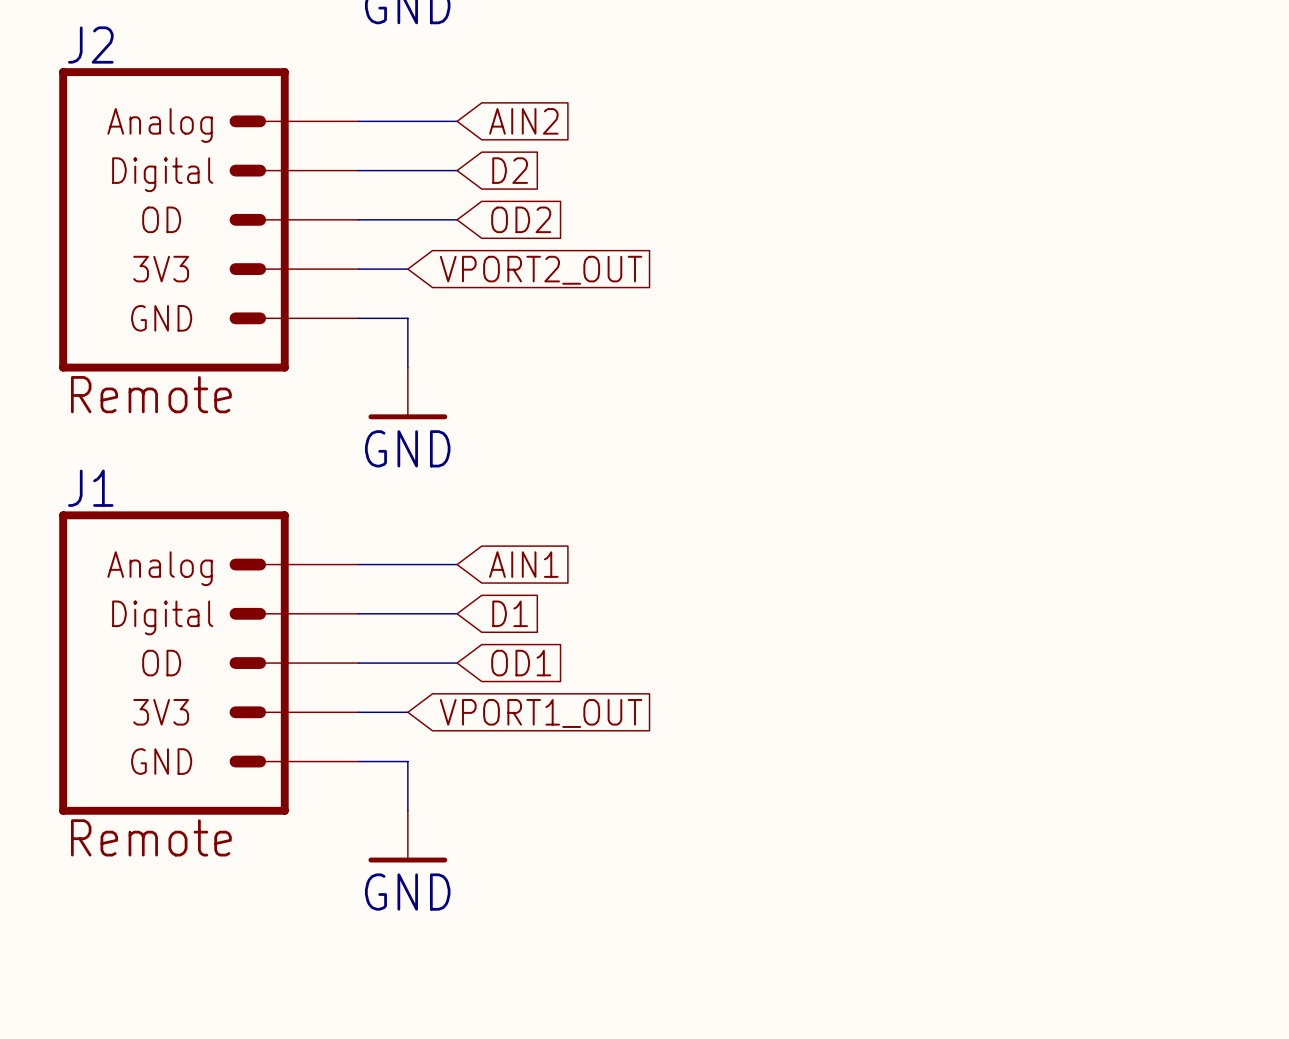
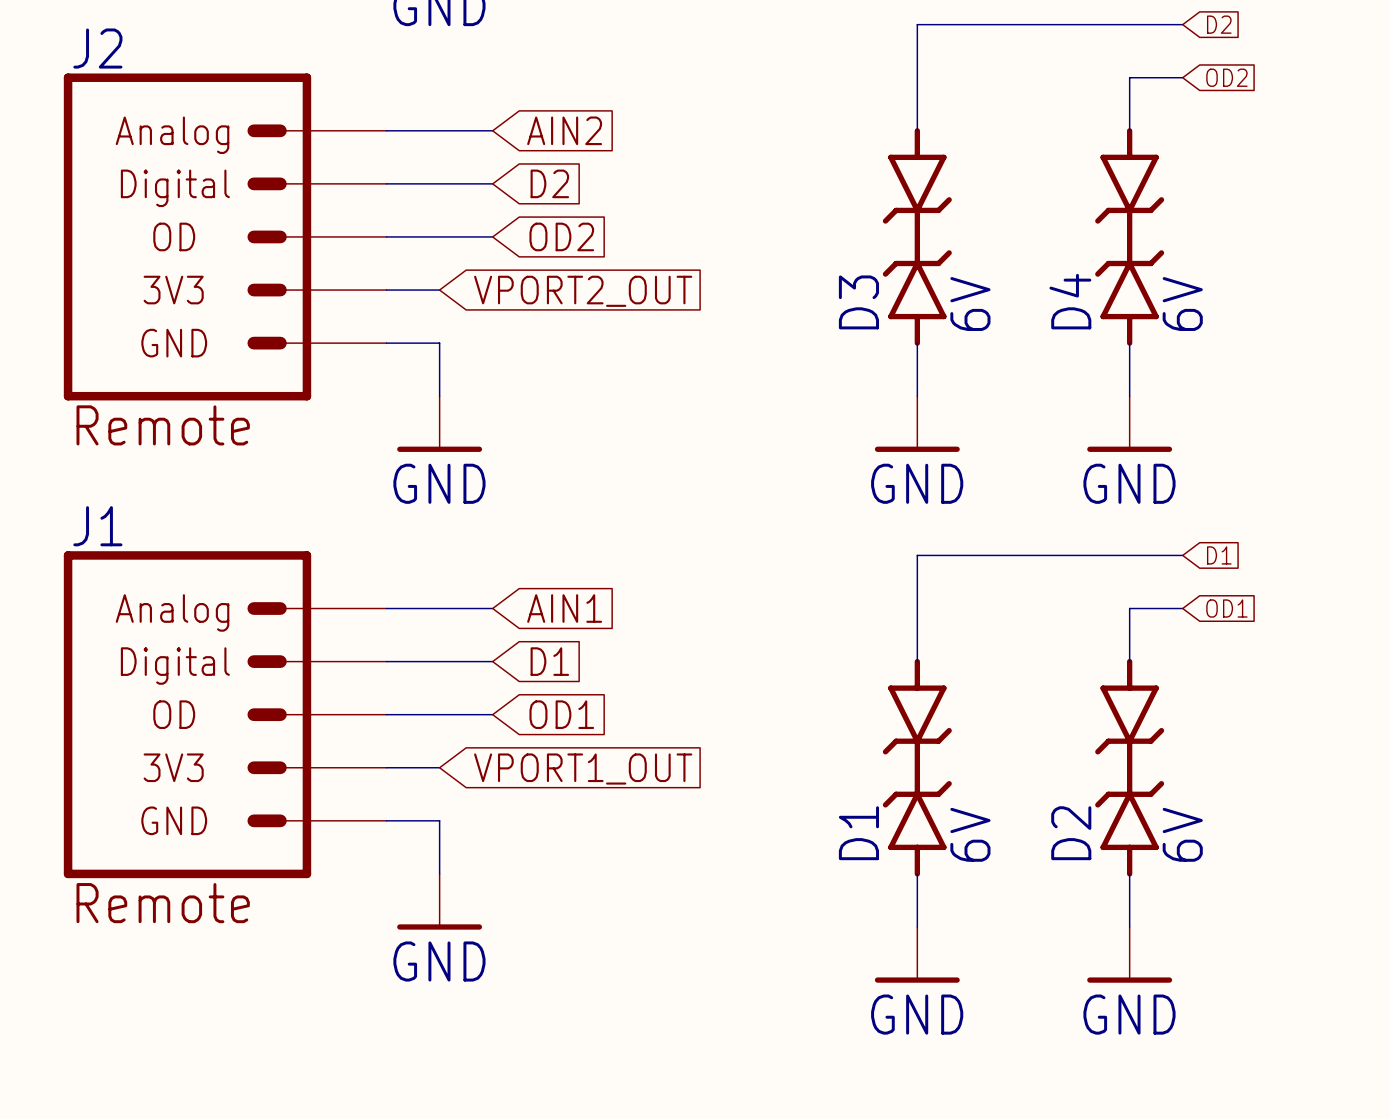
wire: none -> (1182, 24) (917, 24) (917, 130)
global label: none -> D2 (1219, 24)
wire: none -> (1182, 77) (1129, 77) (1129, 130)
global label: none -> OD2 (1226, 77)
D3: none -> 6V (917, 236)
D4: none -> 6V (1129, 236)
wire: none -> (917, 343) (917, 396)
wire: none -> (1129, 343) (1129, 396)
power symbol: none -> GND (917, 424)
power symbol: none -> GND (1129, 424)
wire: none -> (1182, 555) (917, 555) (917, 661)
global label: none -> D1 (1219, 555)
wire: none -> (1182, 608) (1129, 608) (1129, 661)
global label: none -> OD1 (1226, 608)
D1: none -> 6V (917, 767)
D2: none -> 6V (1129, 767)
wire: none -> (917, 873) (917, 926)
wire: none -> (1129, 873) (1129, 926)
power symbol: none -> GND (917, 954)
power symbol: none -> GND (1129, 954)

